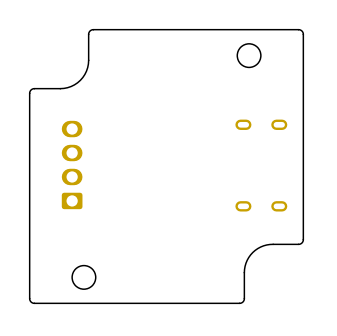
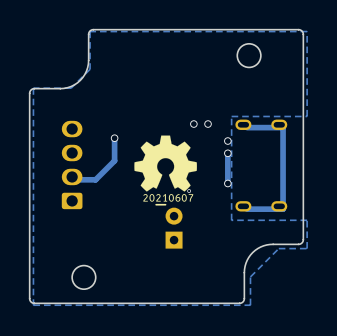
zone outline: none -> (307, 31) (307, 116) (231, 116) (231, 220) (307, 220) (307, 248) (278, 248) (250, 276) (250, 305) (33, 305) (33, 88) (71, 88) (90, 69) (90, 31) (307, 31)
via: none -> (193, 124)
via: none -> (208, 124)
track: none -> (247, 127) (283, 127) (283, 209) (247, 209)
drawing: none -> [134, 135, 197, 206]
track: none -> (114, 138) (114, 160) (95, 179) (75, 179)
via: none -> (114, 138)
via: none -> (227, 141)
track: none -> (227, 153) (227, 183)
via: none -> (227, 153)
via: none -> (227, 183)
via: none -> (189, 191)
part: none -> (174, 228)

